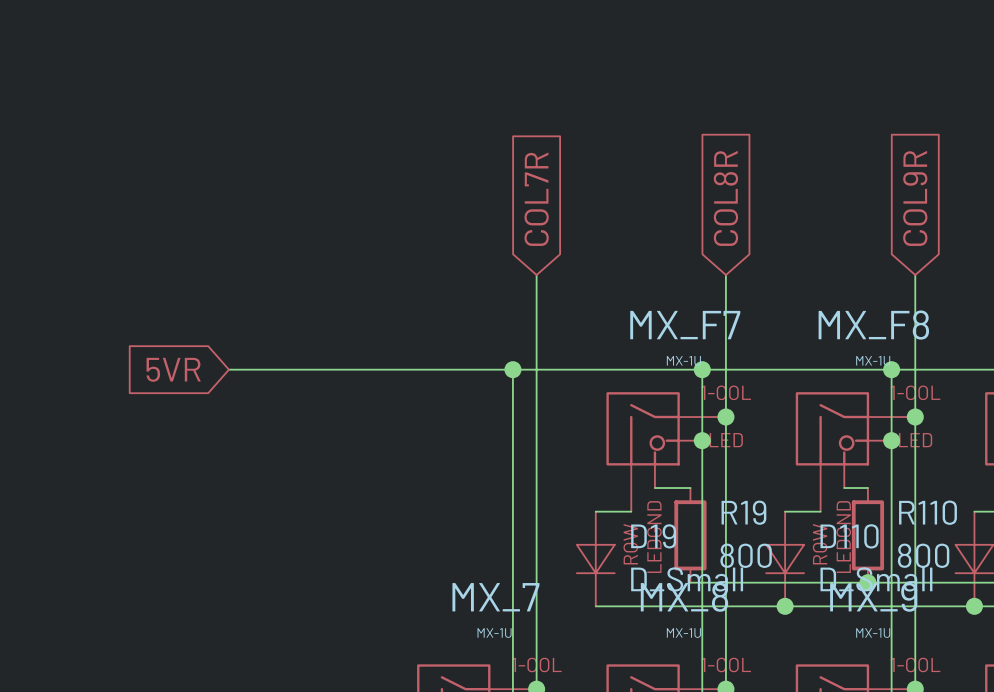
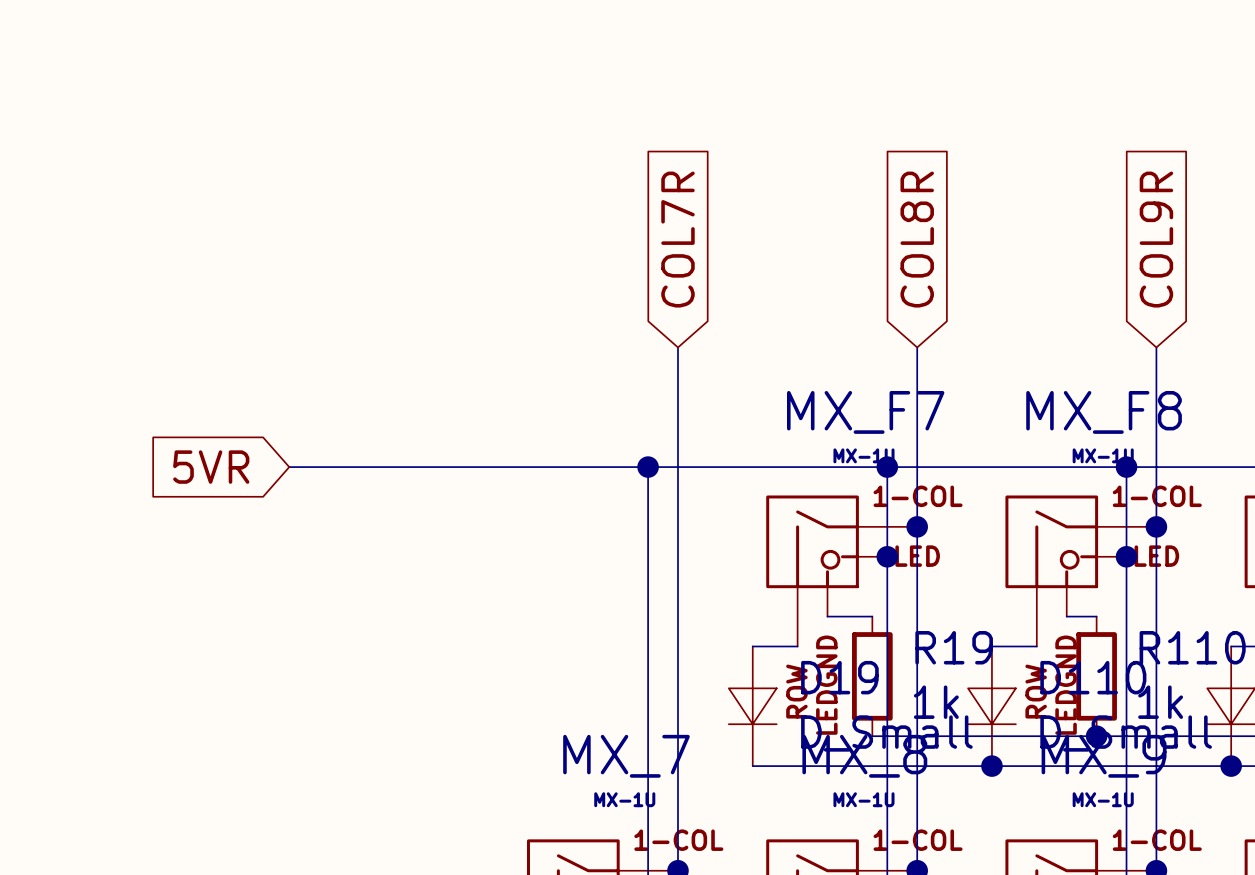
R19 value: 800 (746, 555) -> 1k (936, 702)
R110 value: 800 (923, 555) -> 1k (1160, 702)

